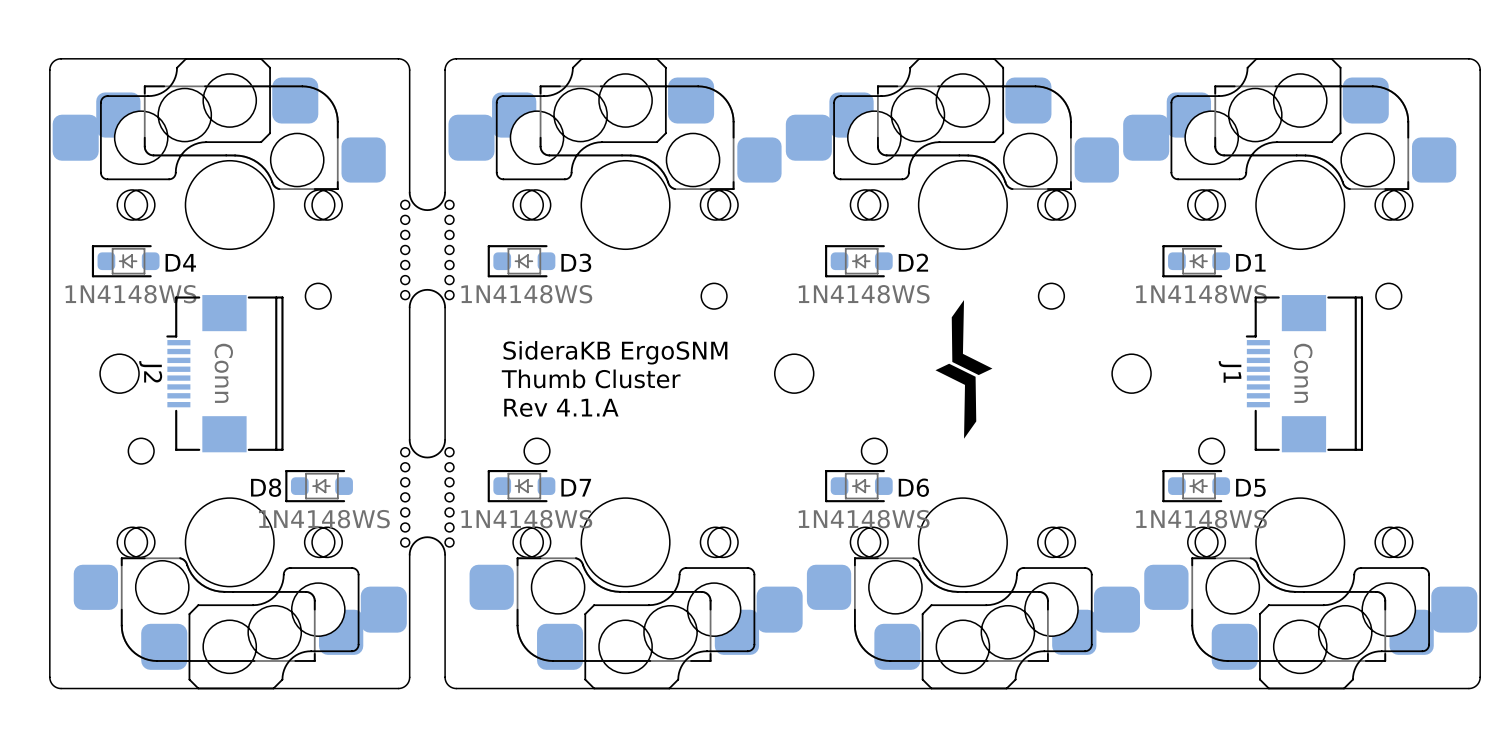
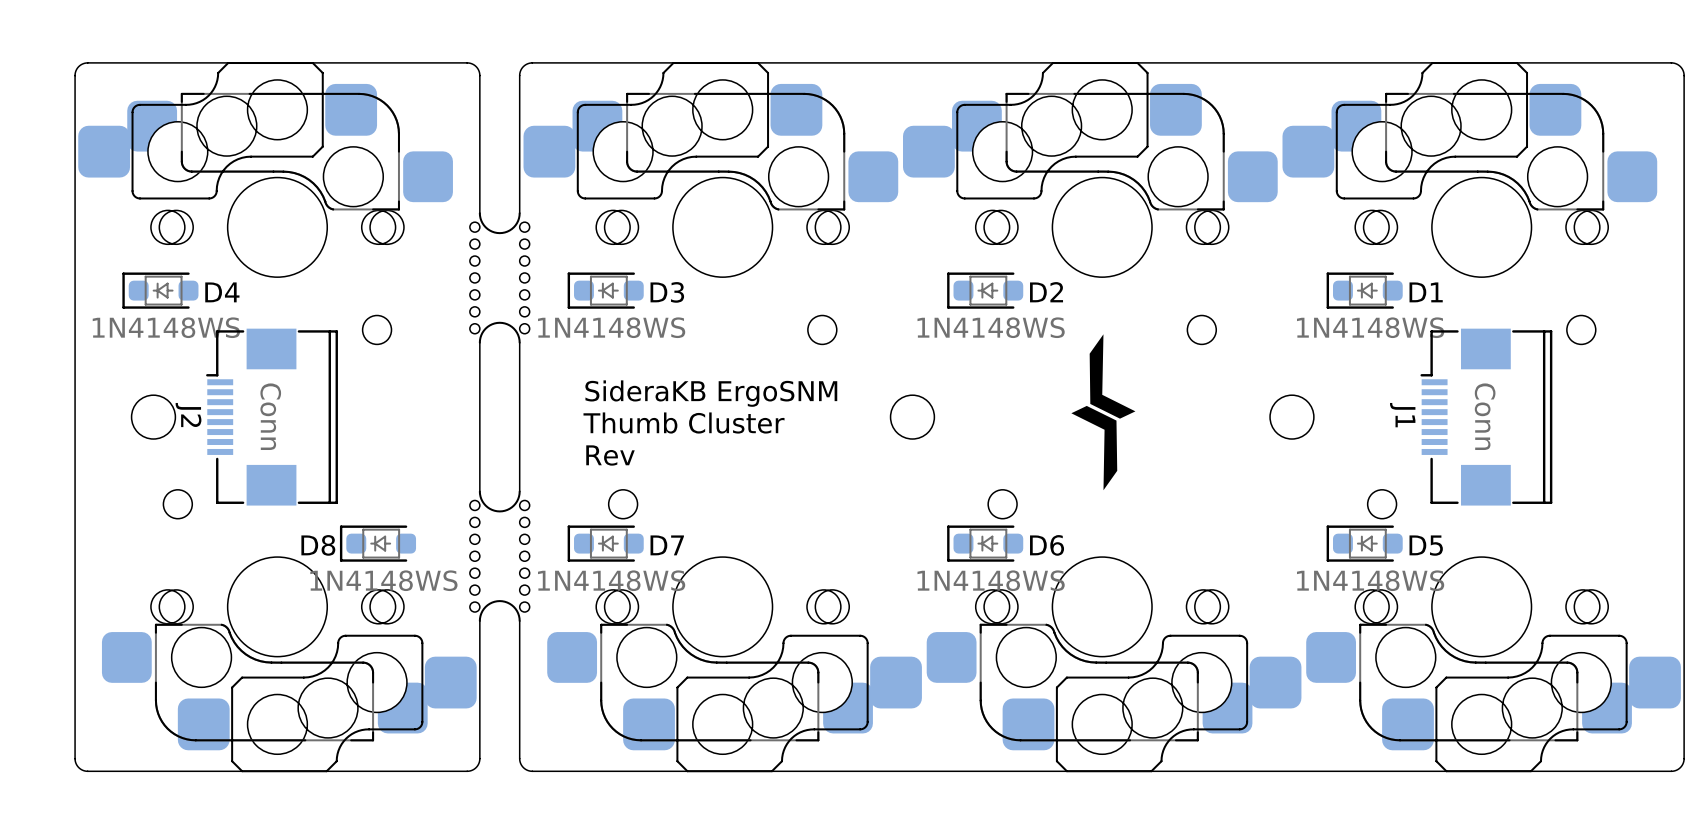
text: Rev 4.1.A (561, 407) -> Rev (610, 455)

